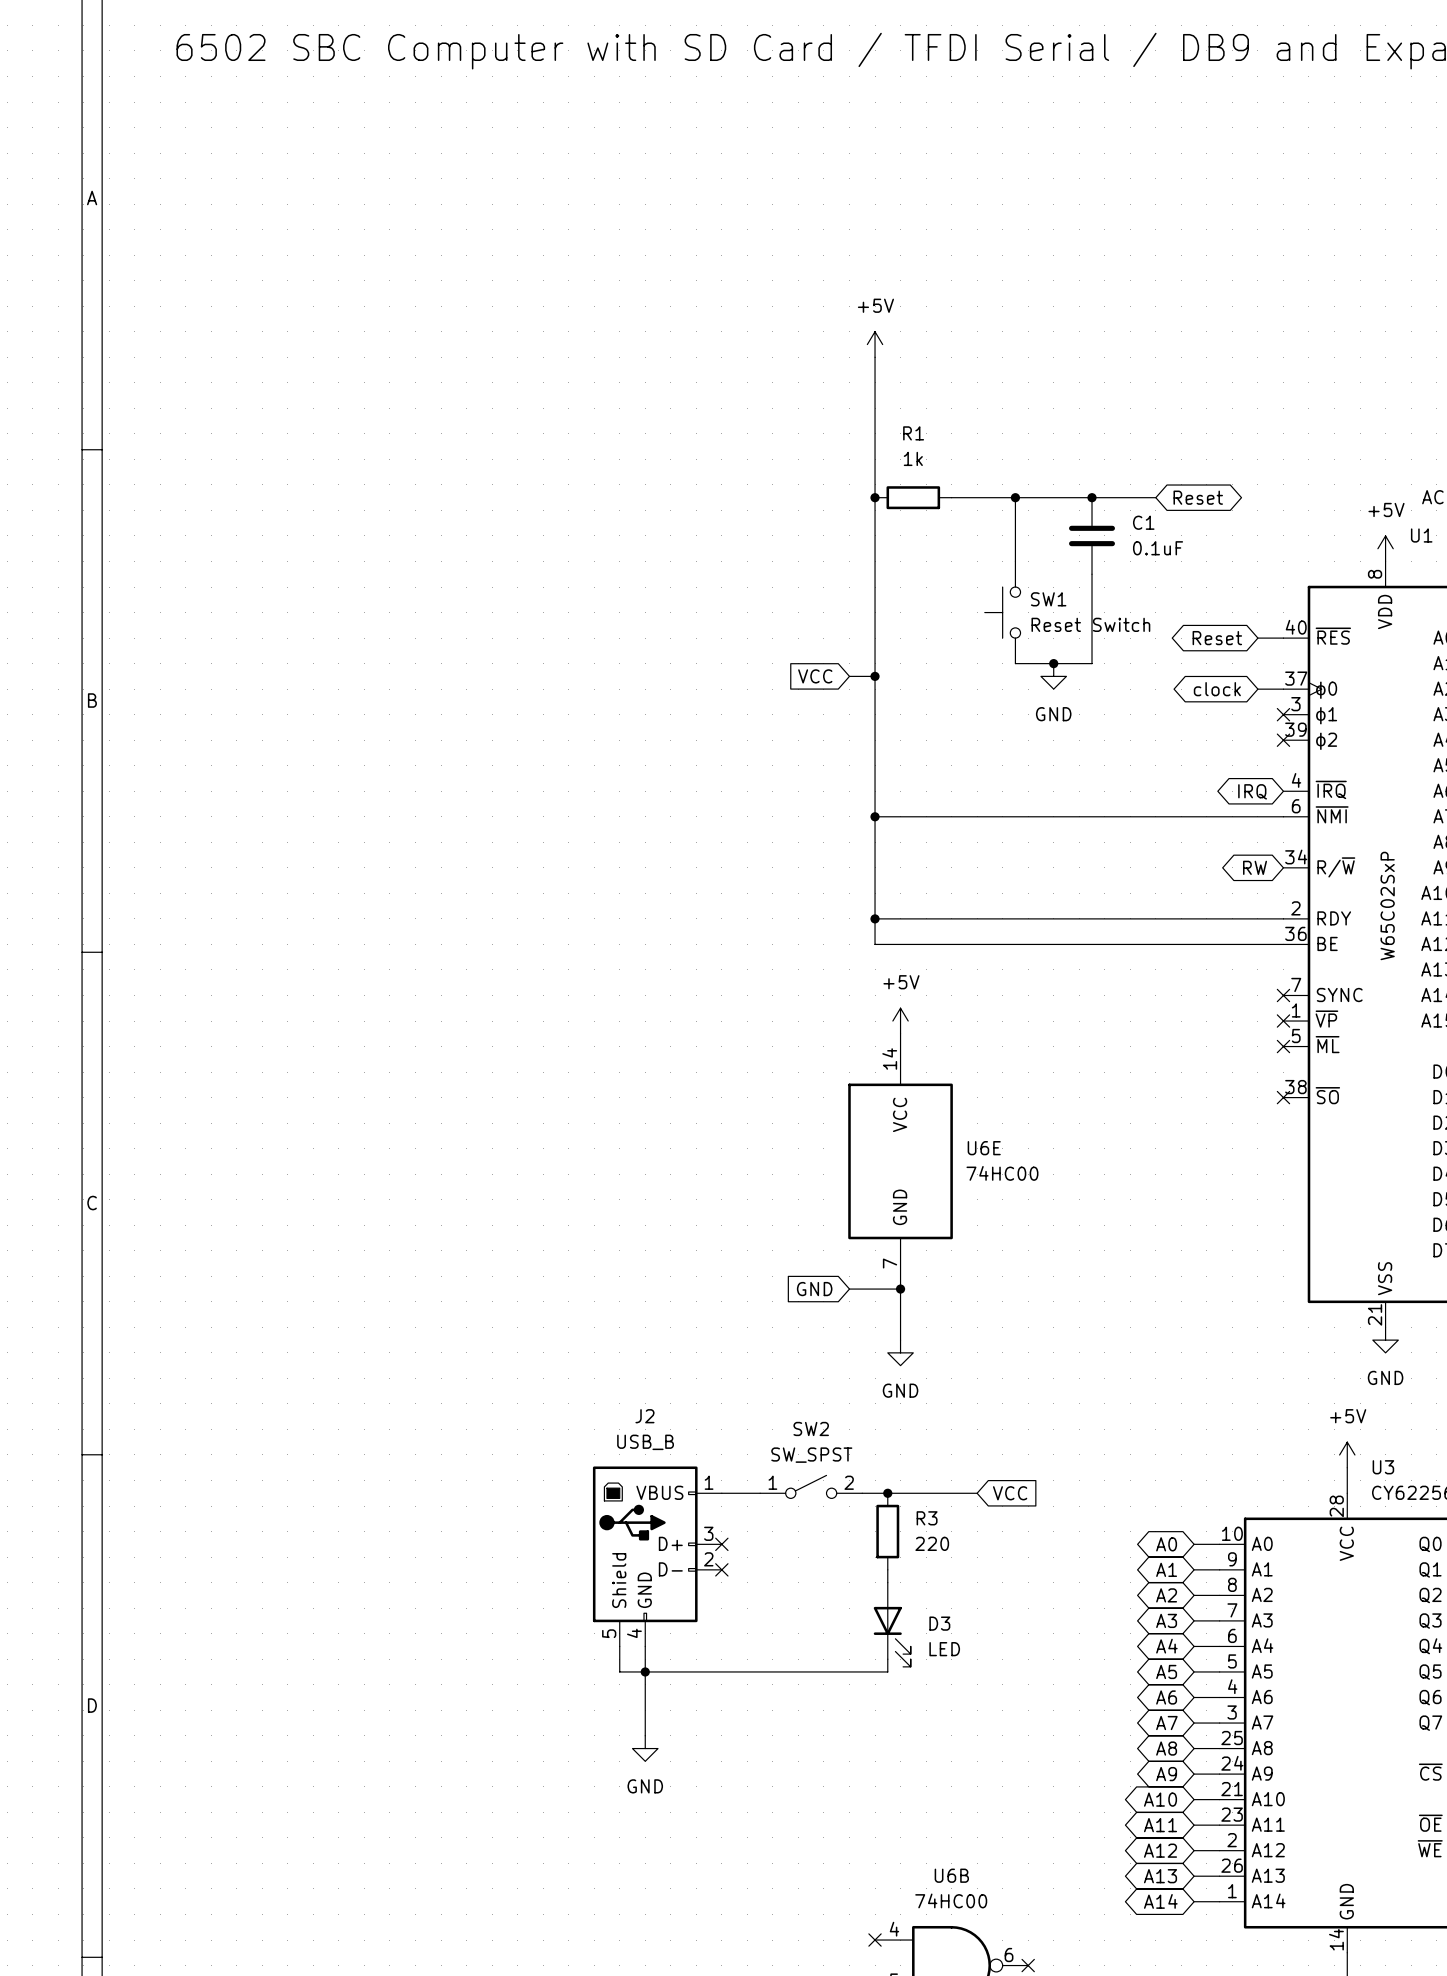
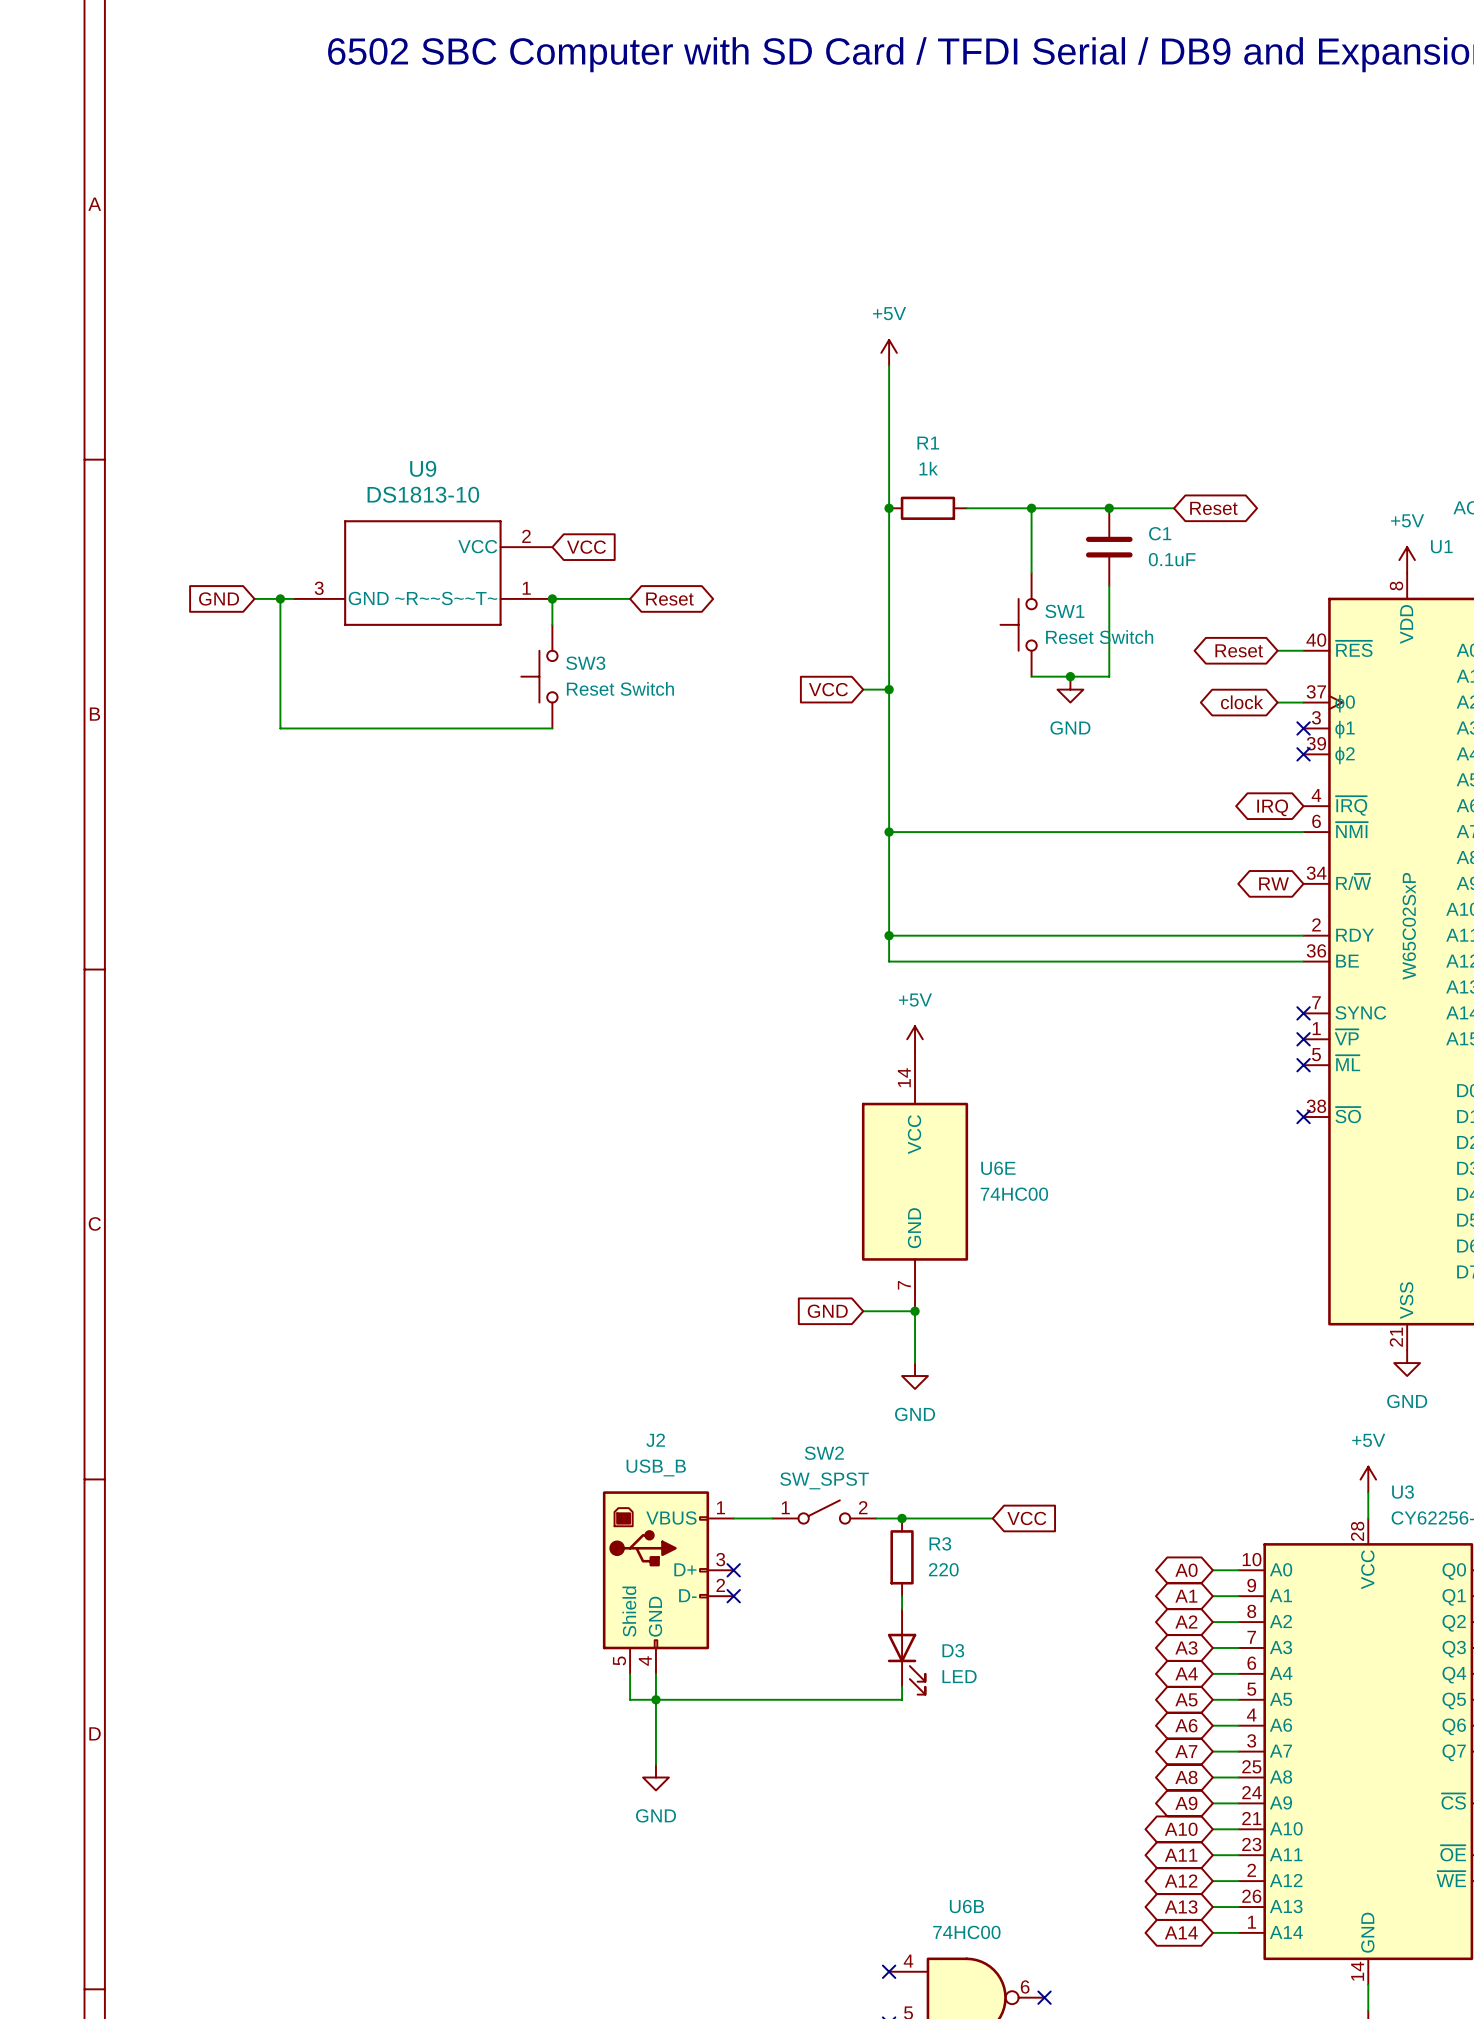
global label: none -> VCC (586, 547)
U9: none -> DS1813-10 (422, 573)
global label: none -> GND (219, 598)
wire: none -> (254, 598) (293, 598)
wire: none -> (280, 598) (280, 728) (552, 728)
junction: none -> (280, 598)
junction: none -> (552, 598)
wire: none -> (630, 598) (552, 598) (552, 624)
global label: none -> Reset (669, 599)
SW3: none -> Reset Switch (539, 676)

